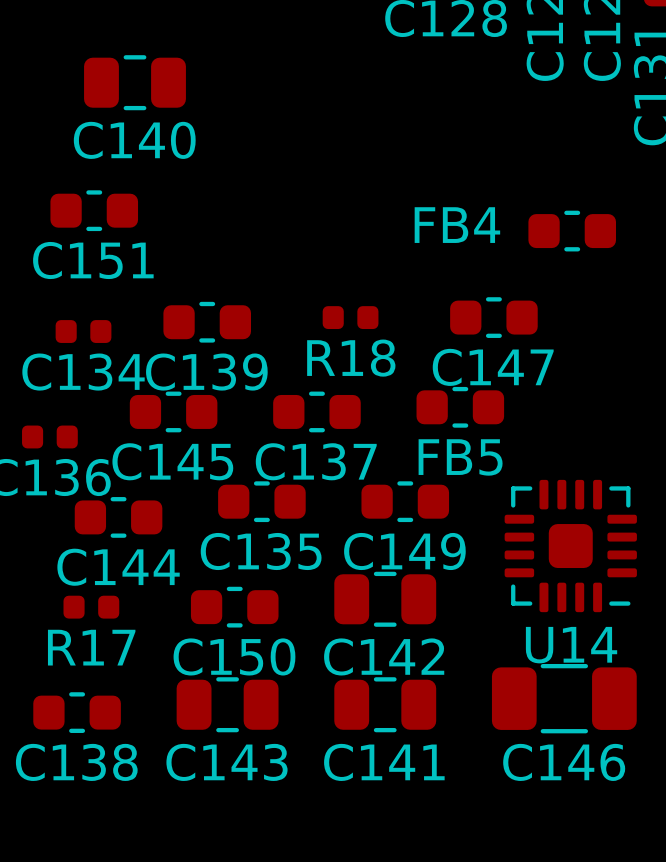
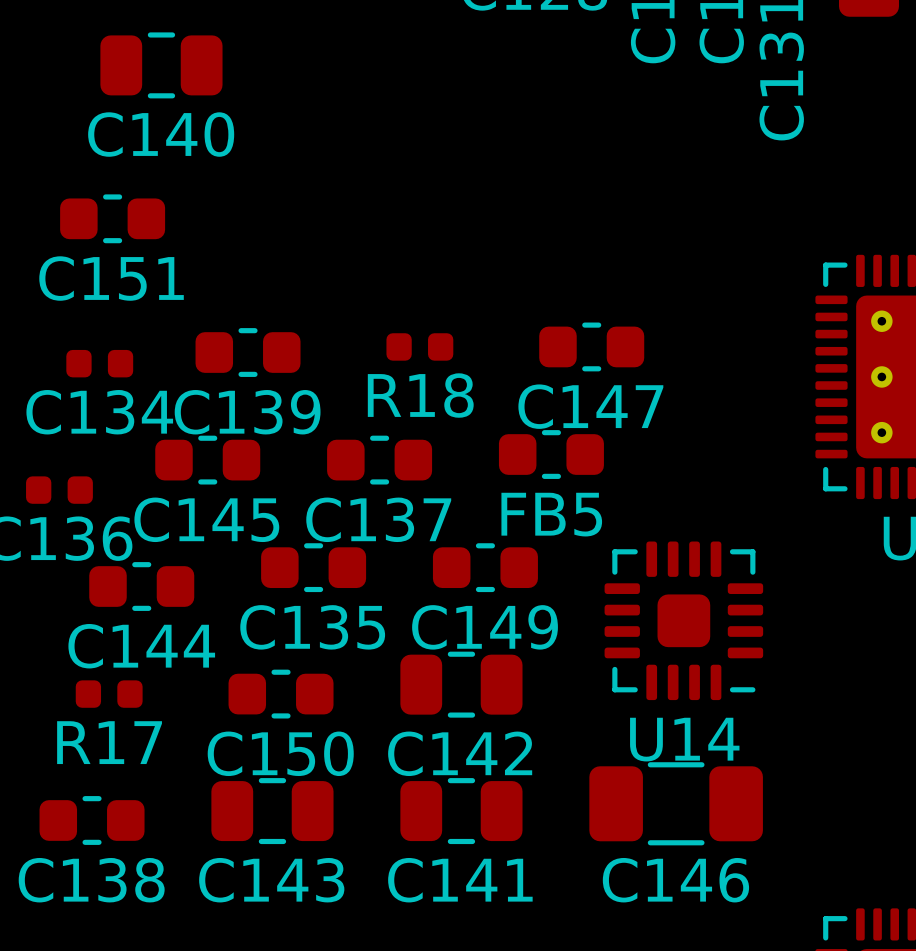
FB4: (572, 231) -> none

